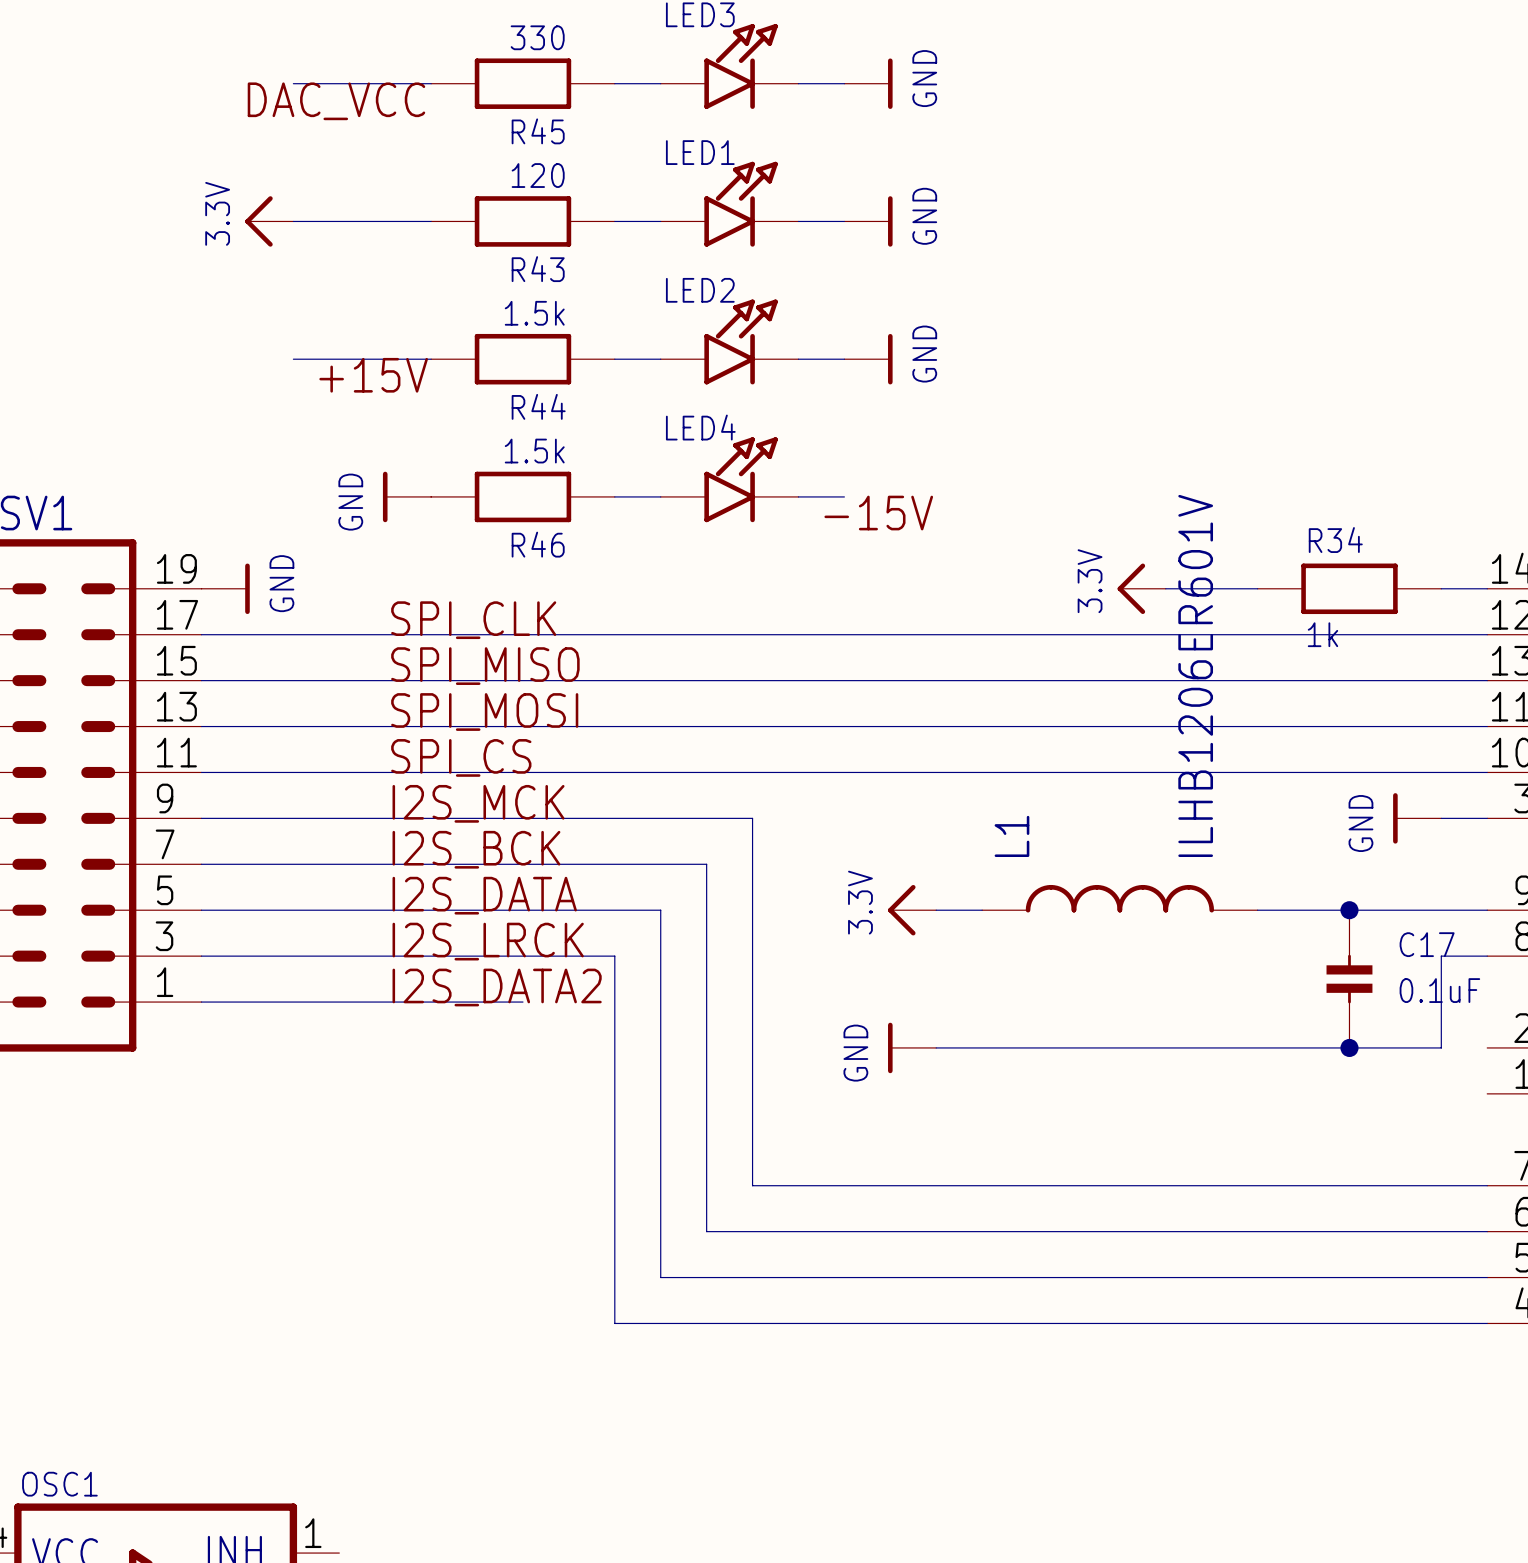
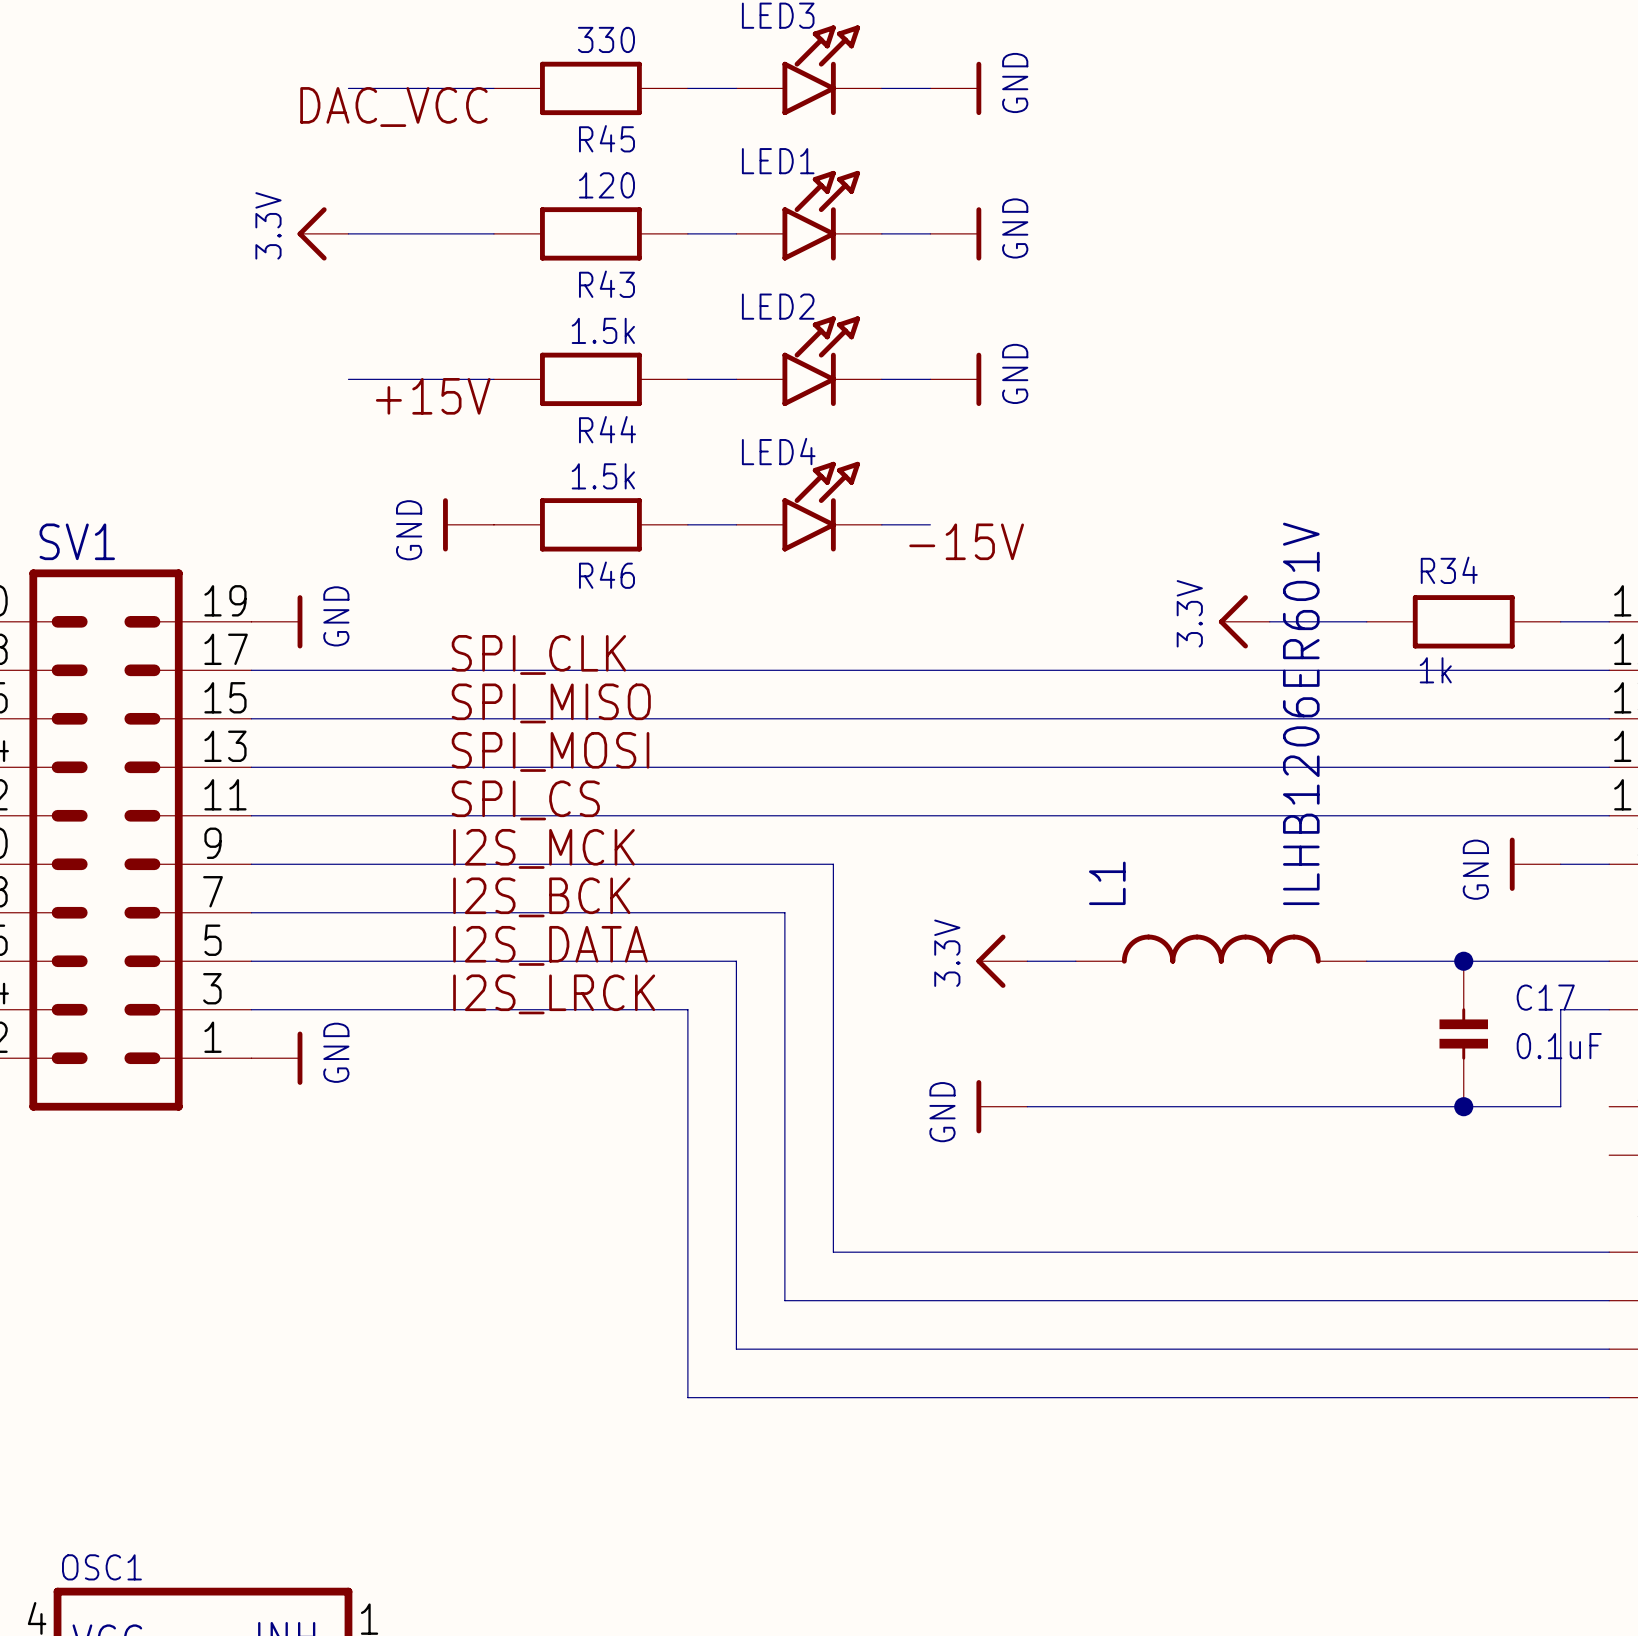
label: I2S_DATA2 (497, 987) -> none
wire: (201, 1002) (522, 1002) -> none
power symbol: none -> GND (276, 1058)

